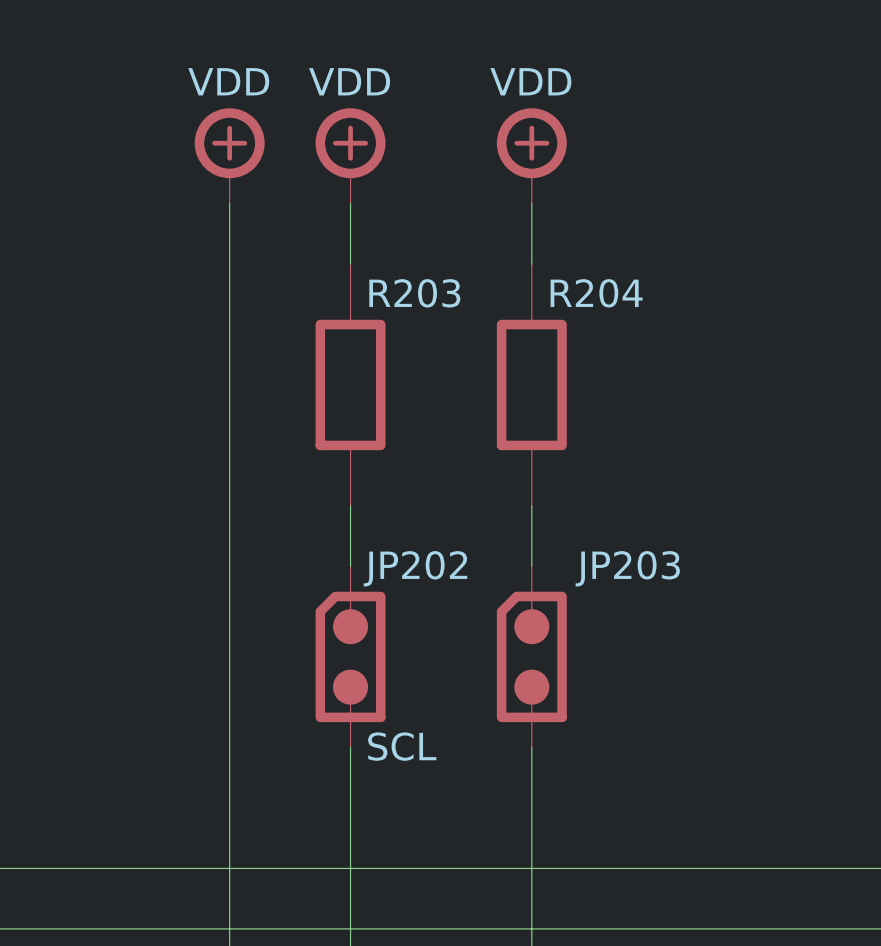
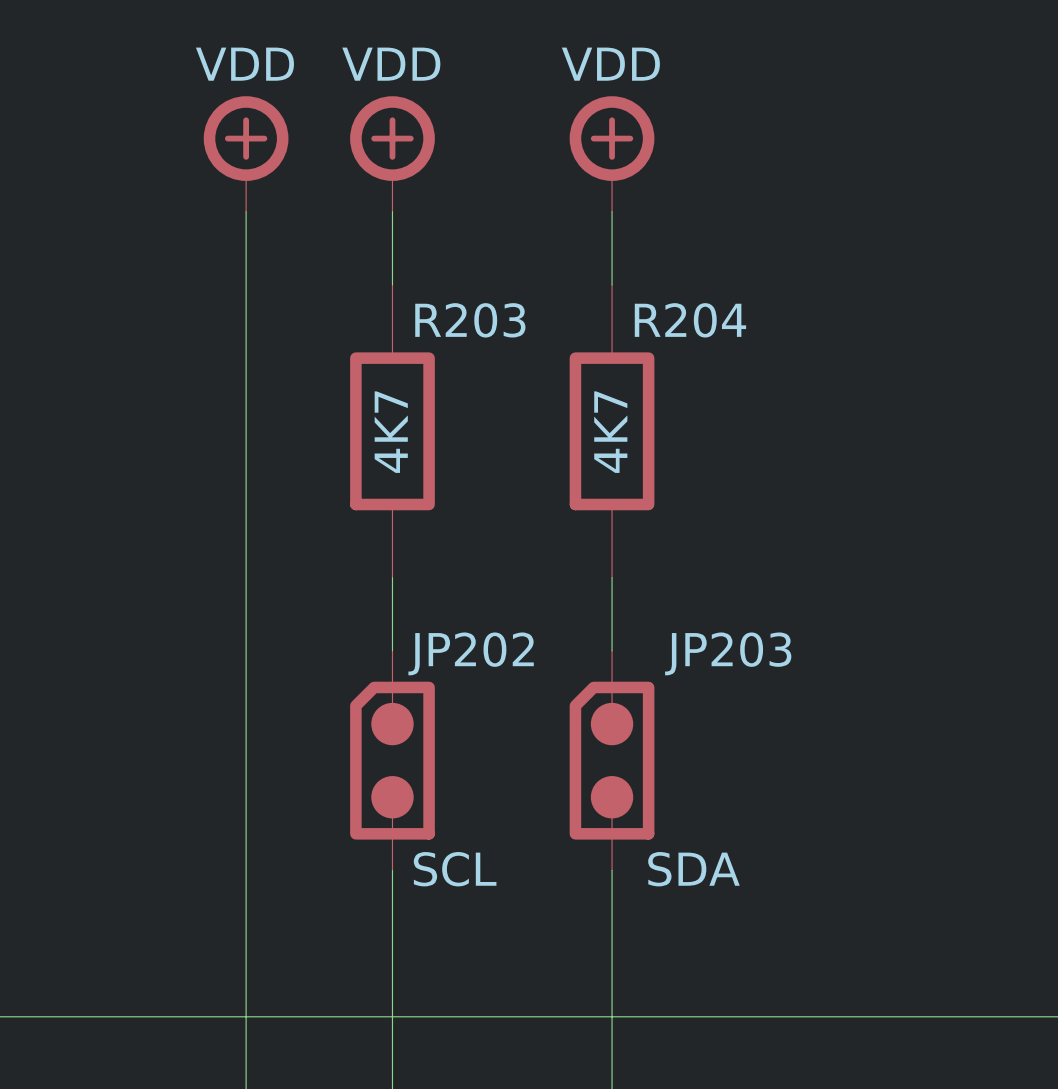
R203 value: none -> 4K7 (391, 432)
R204 value: none -> 4K7 (610, 432)
JP203 value: none -> SDA (693, 869)

